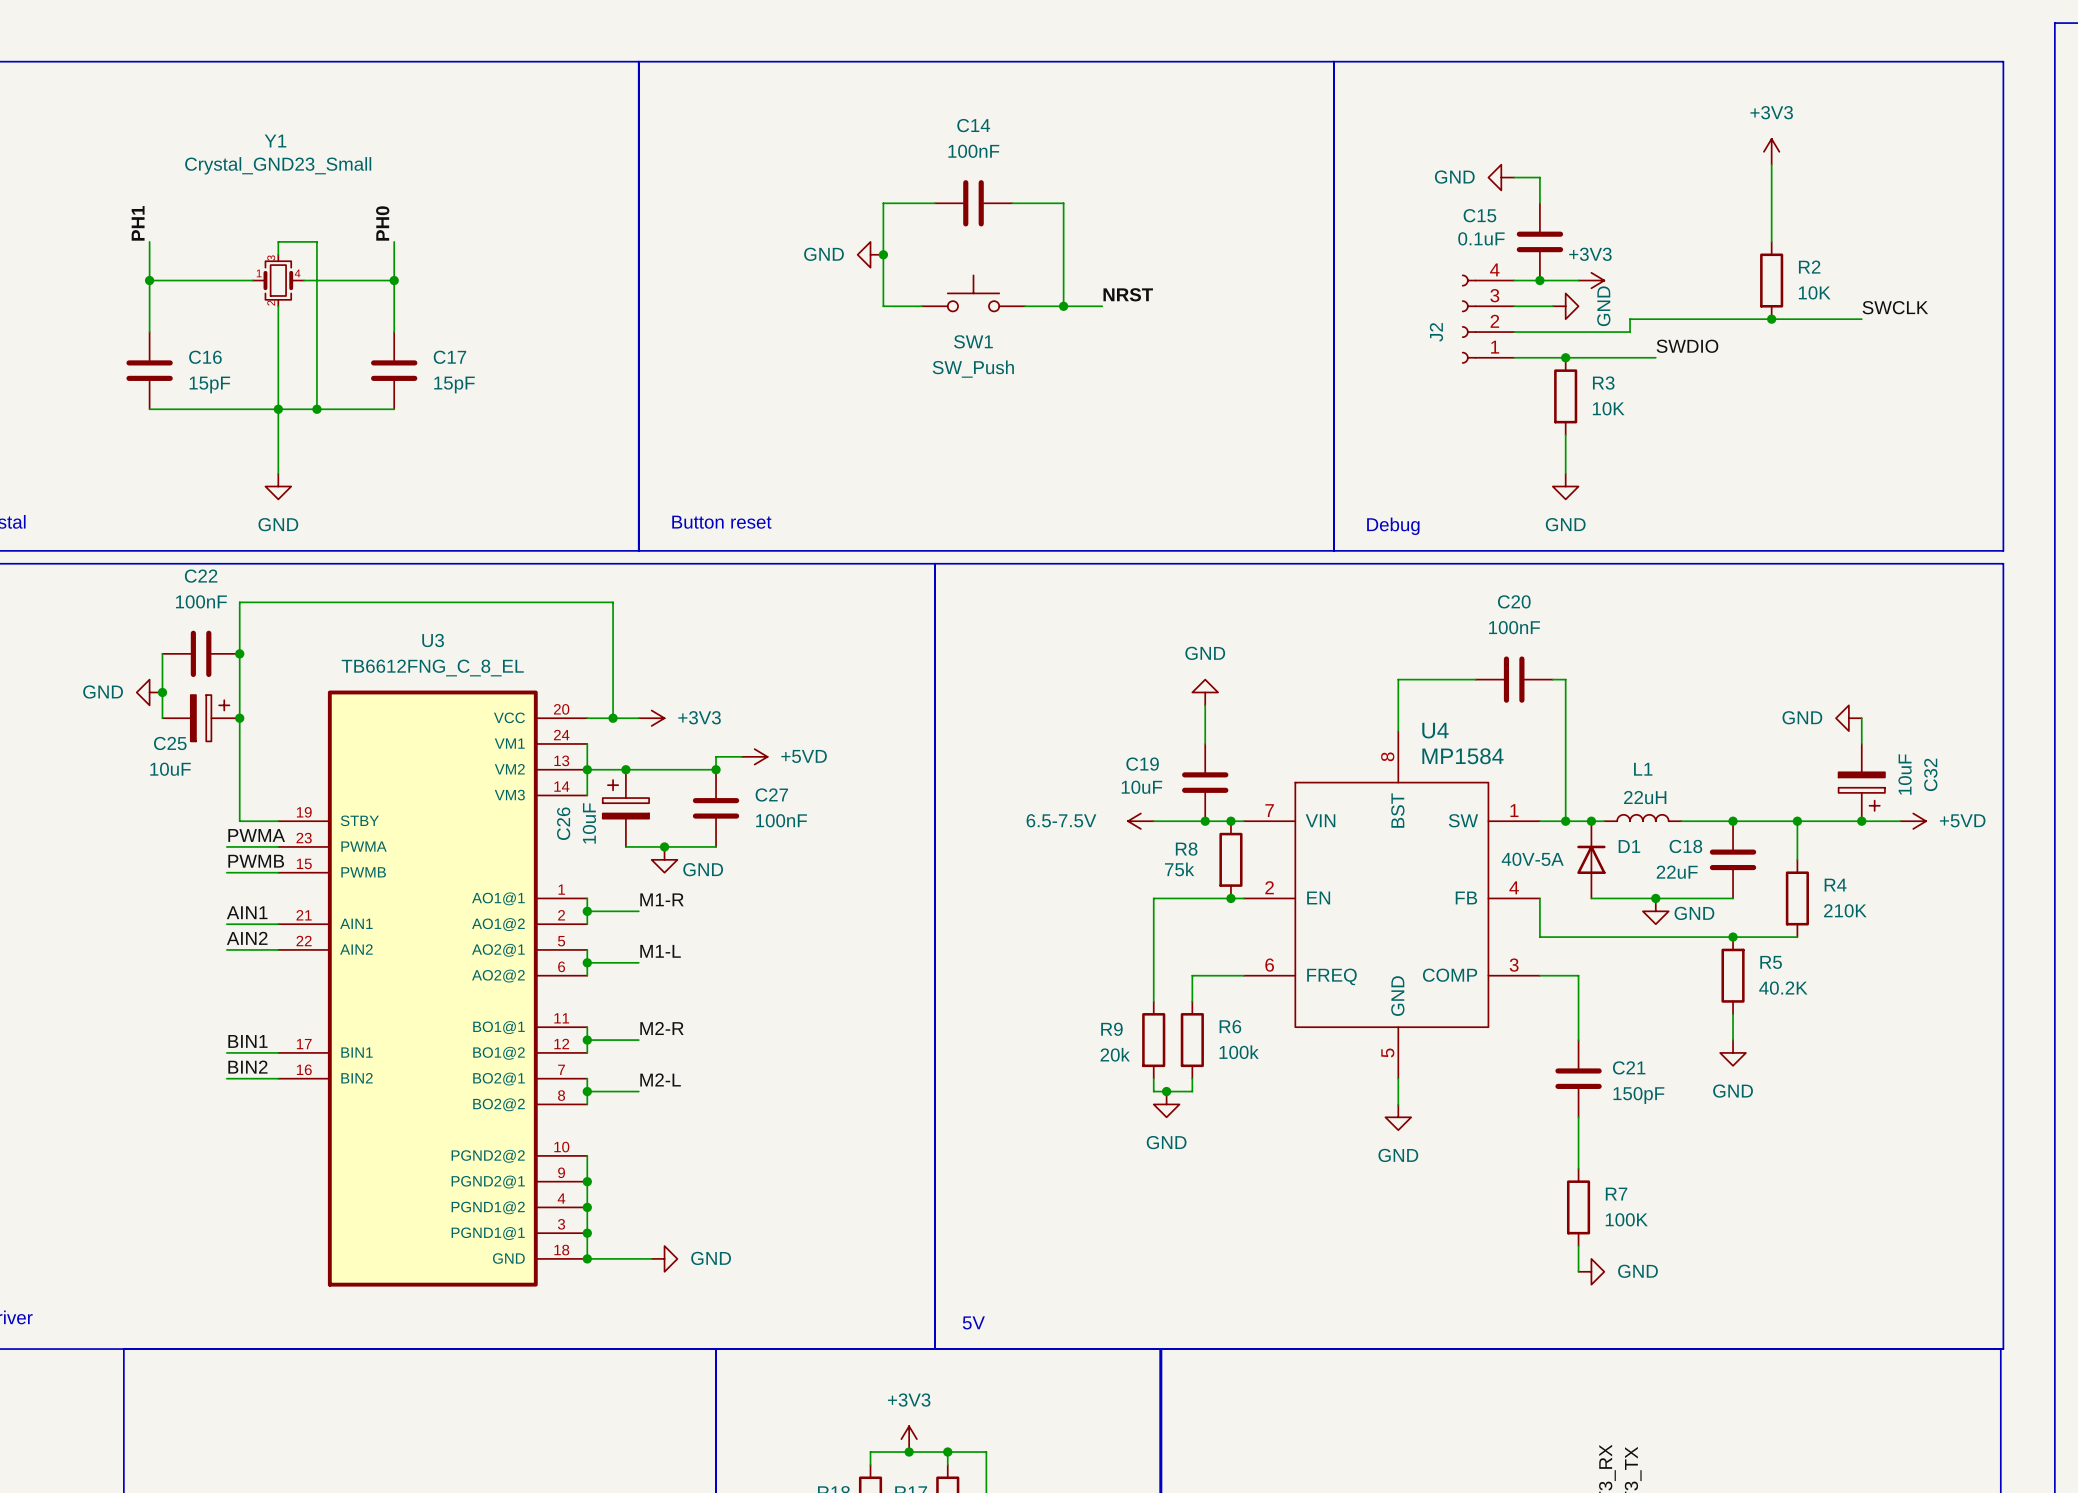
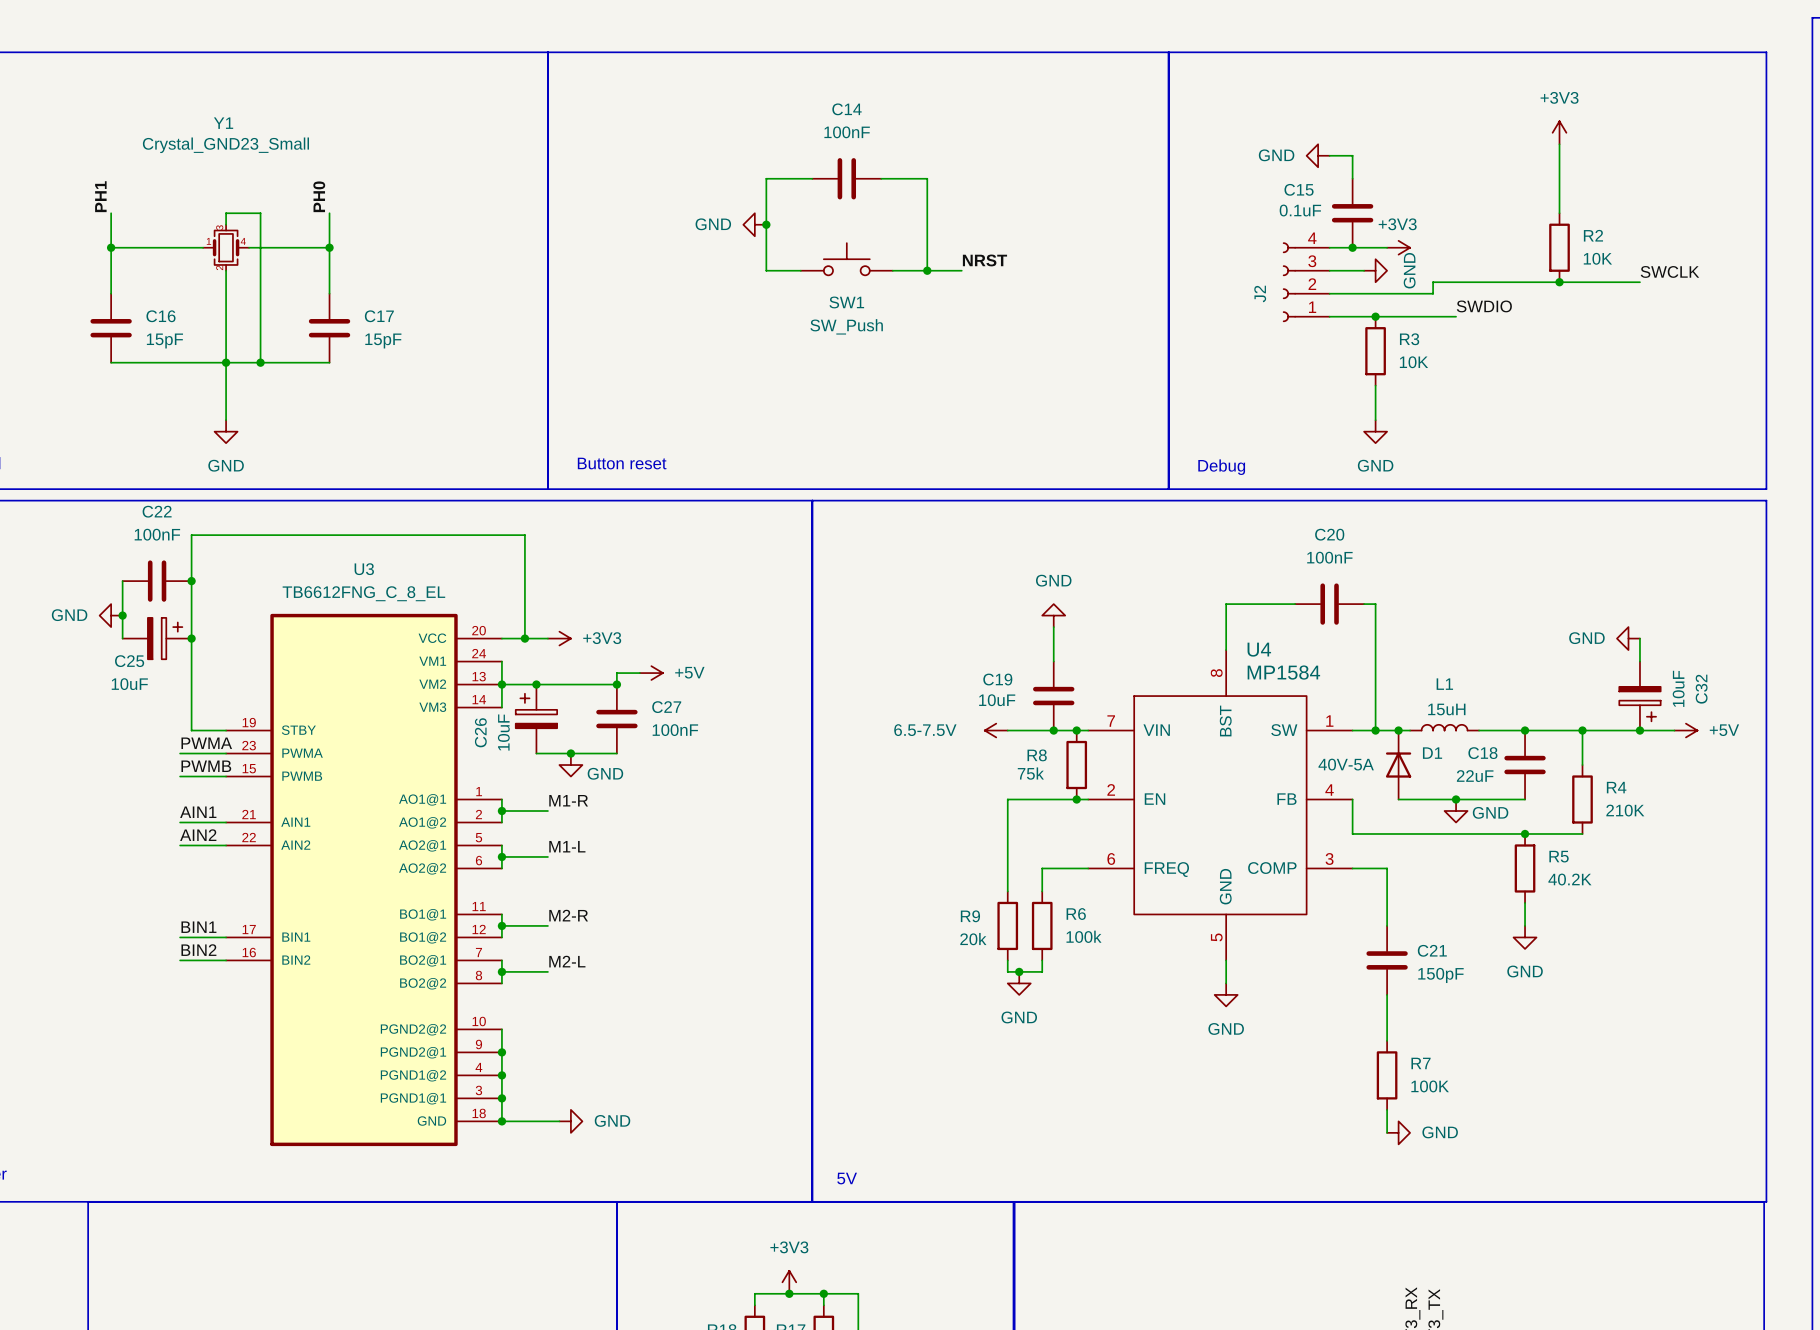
power symbol: +5VD (754, 756) -> +5V (651, 673)
L1 value: 22uH (1645, 797) -> 15uH (1446, 709)
power symbol: +5VD (1913, 821) -> +5V (1685, 730)

